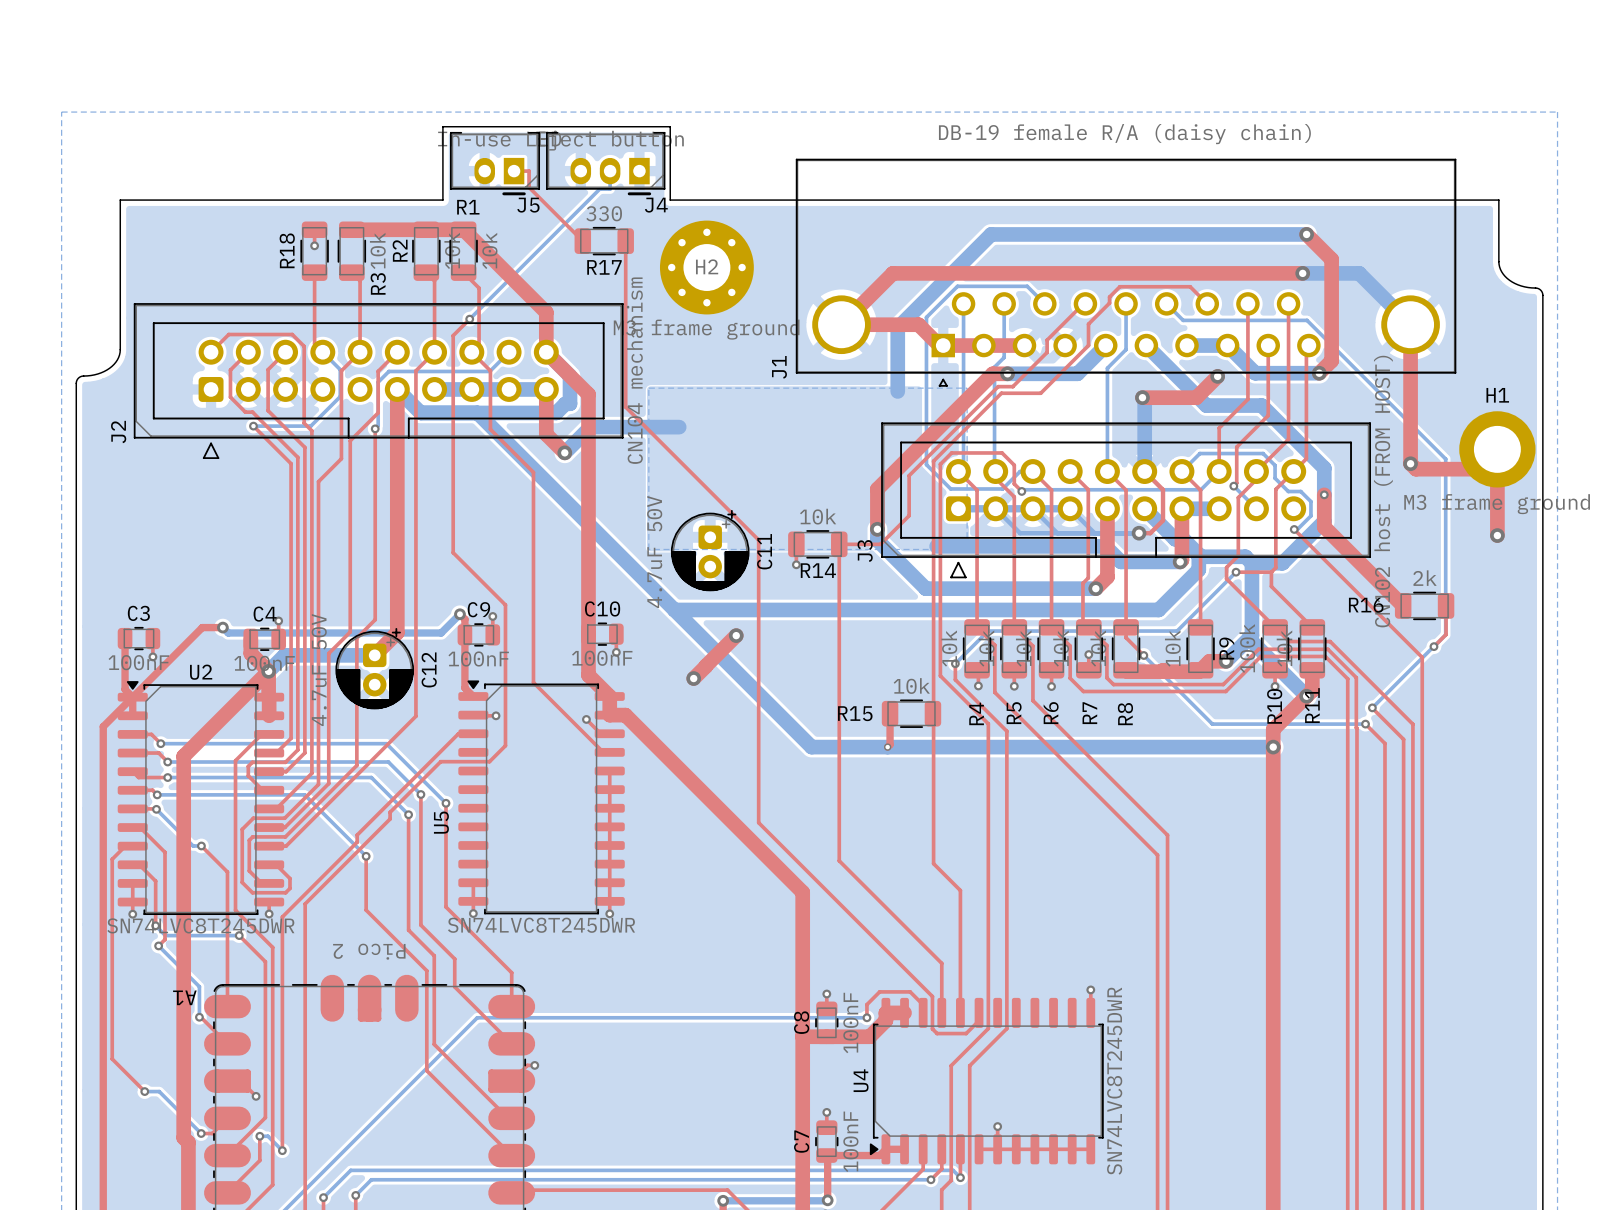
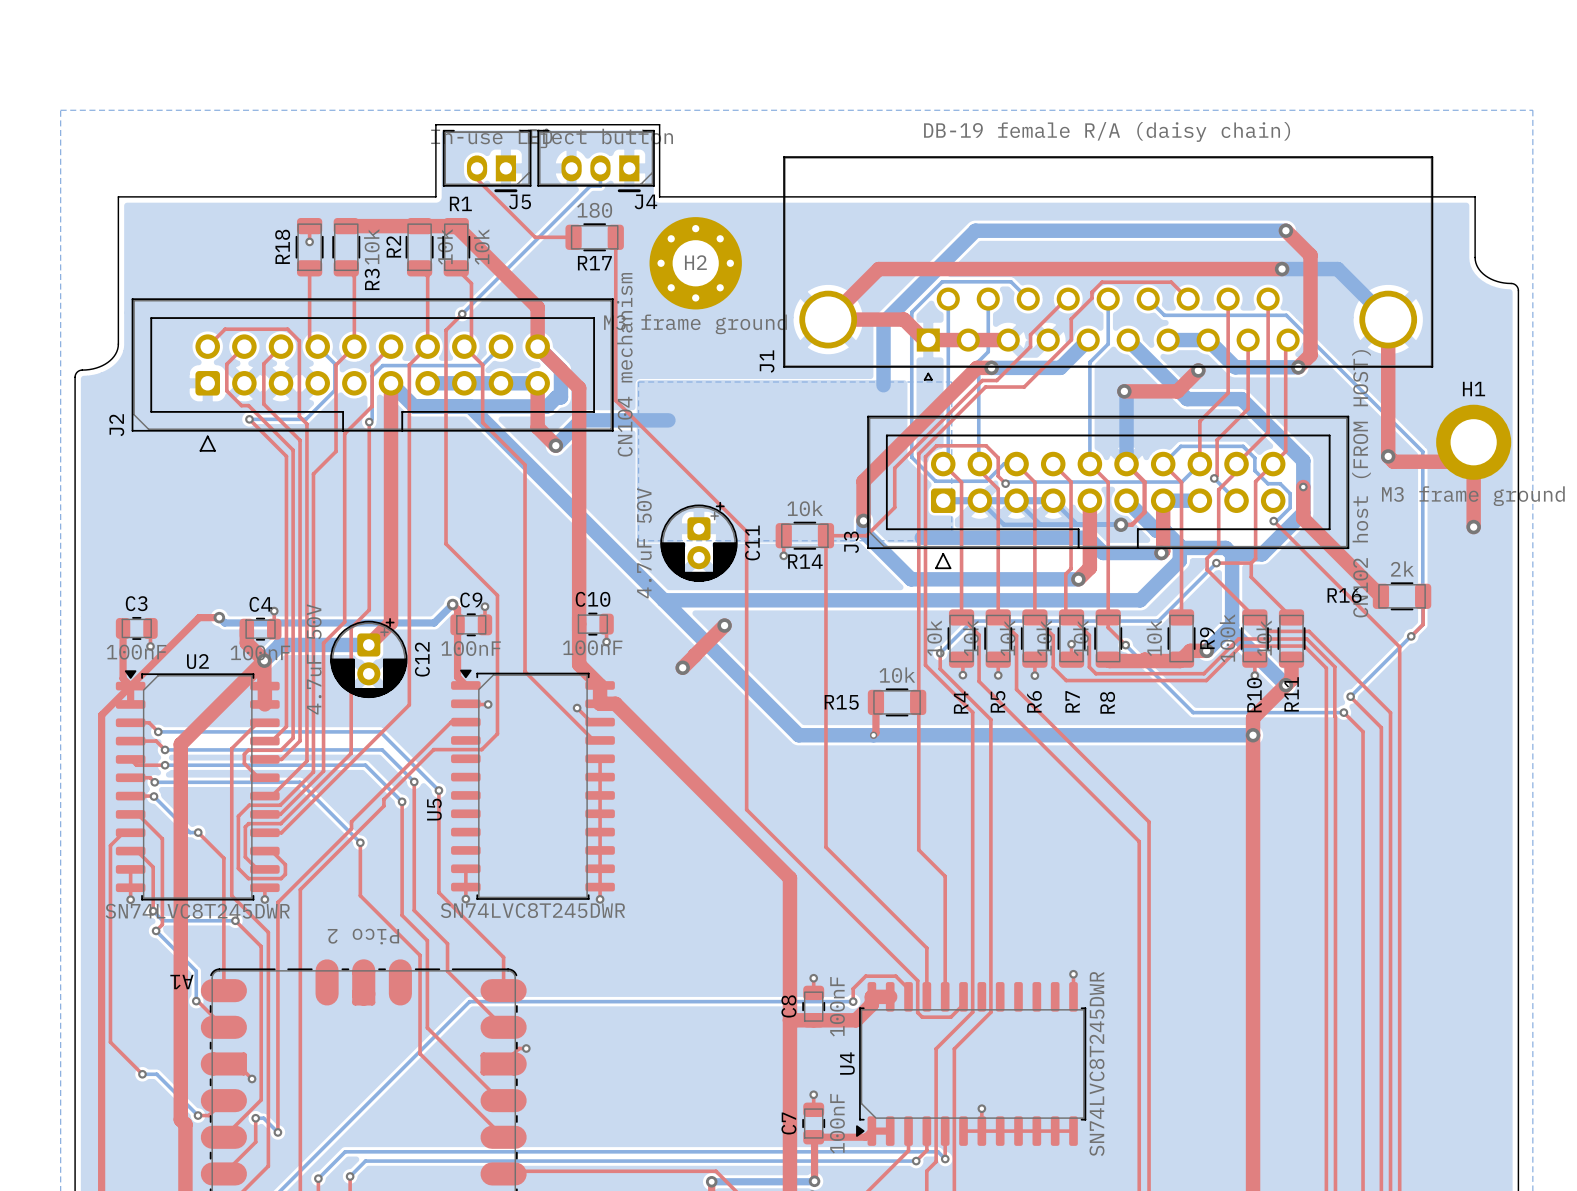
top track: (514, 171) (529, 171) (529, 187) (582, 241) -> (477, 168) (477, 179) (535, 237) (573, 237)
R17 value: 330 (604, 213) -> 180 (594, 210)

